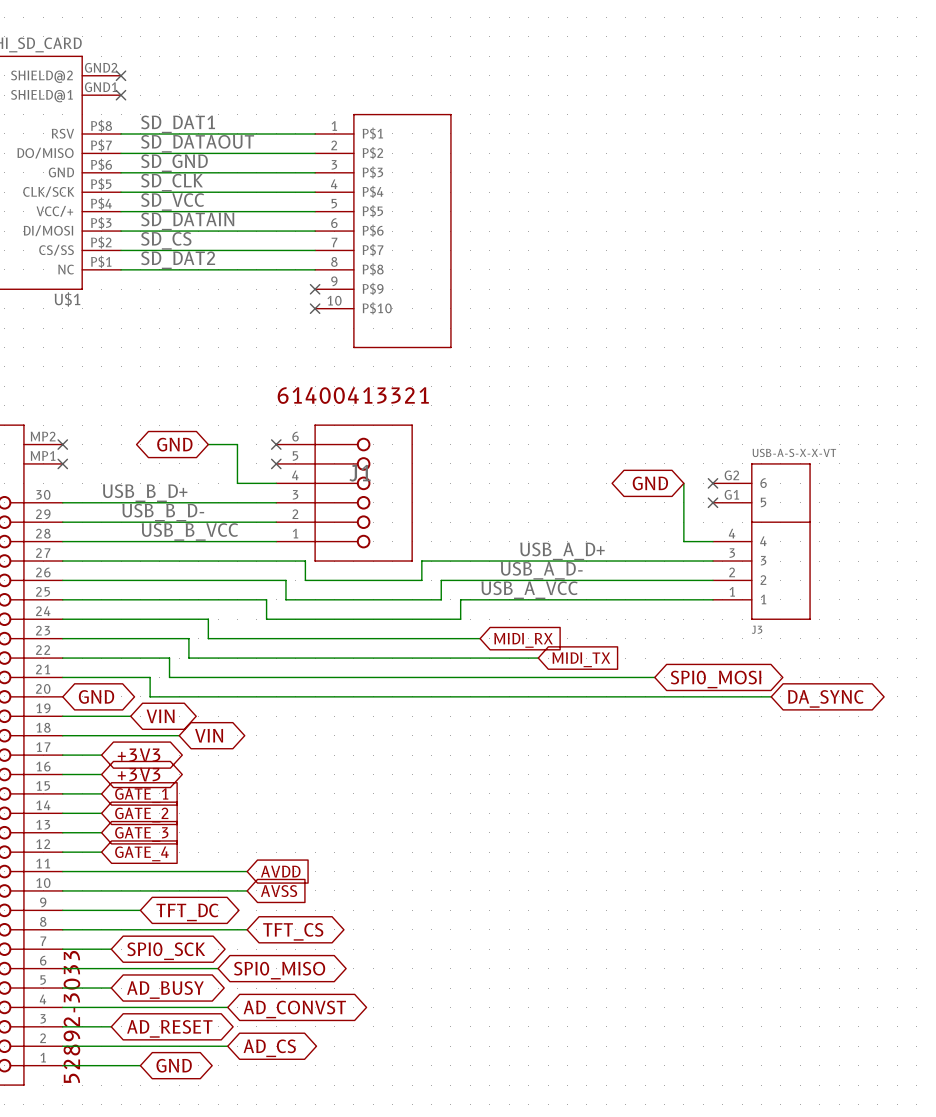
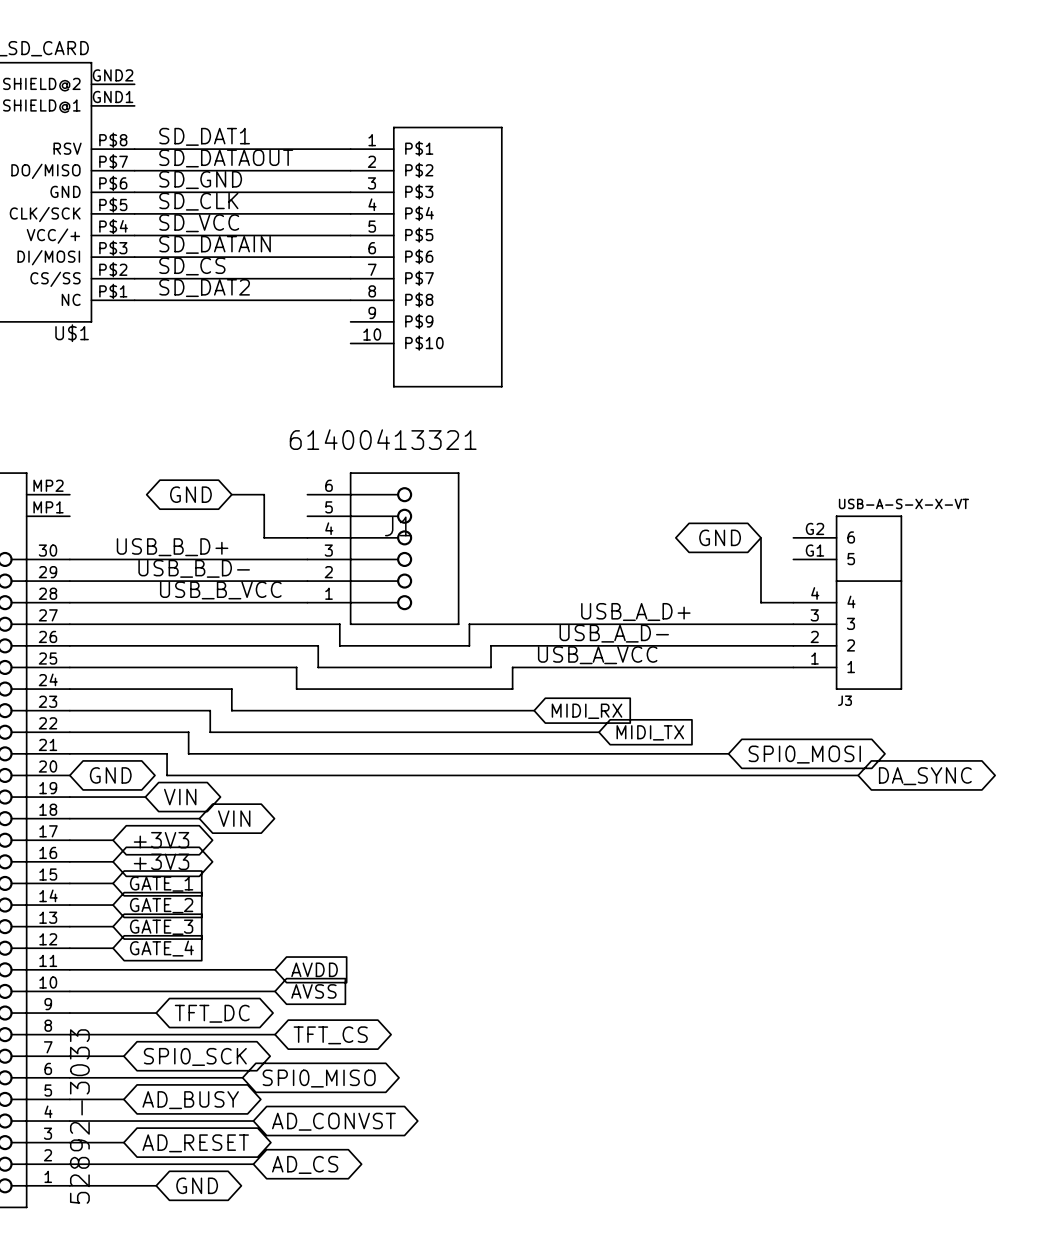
no-connect mark: (121, 75) -> none
no-connect mark: (121, 95) -> none
no-connect mark: (315, 289) -> none
no-connect mark: (315, 308) -> none
no-connect mark: (62, 444) -> none
no-connect mark: (276, 444) -> none
no-connect mark: (62, 463) -> none
no-connect mark: (276, 463) -> none
no-connect mark: (712, 483) -> none
no-connect mark: (712, 502) -> none

